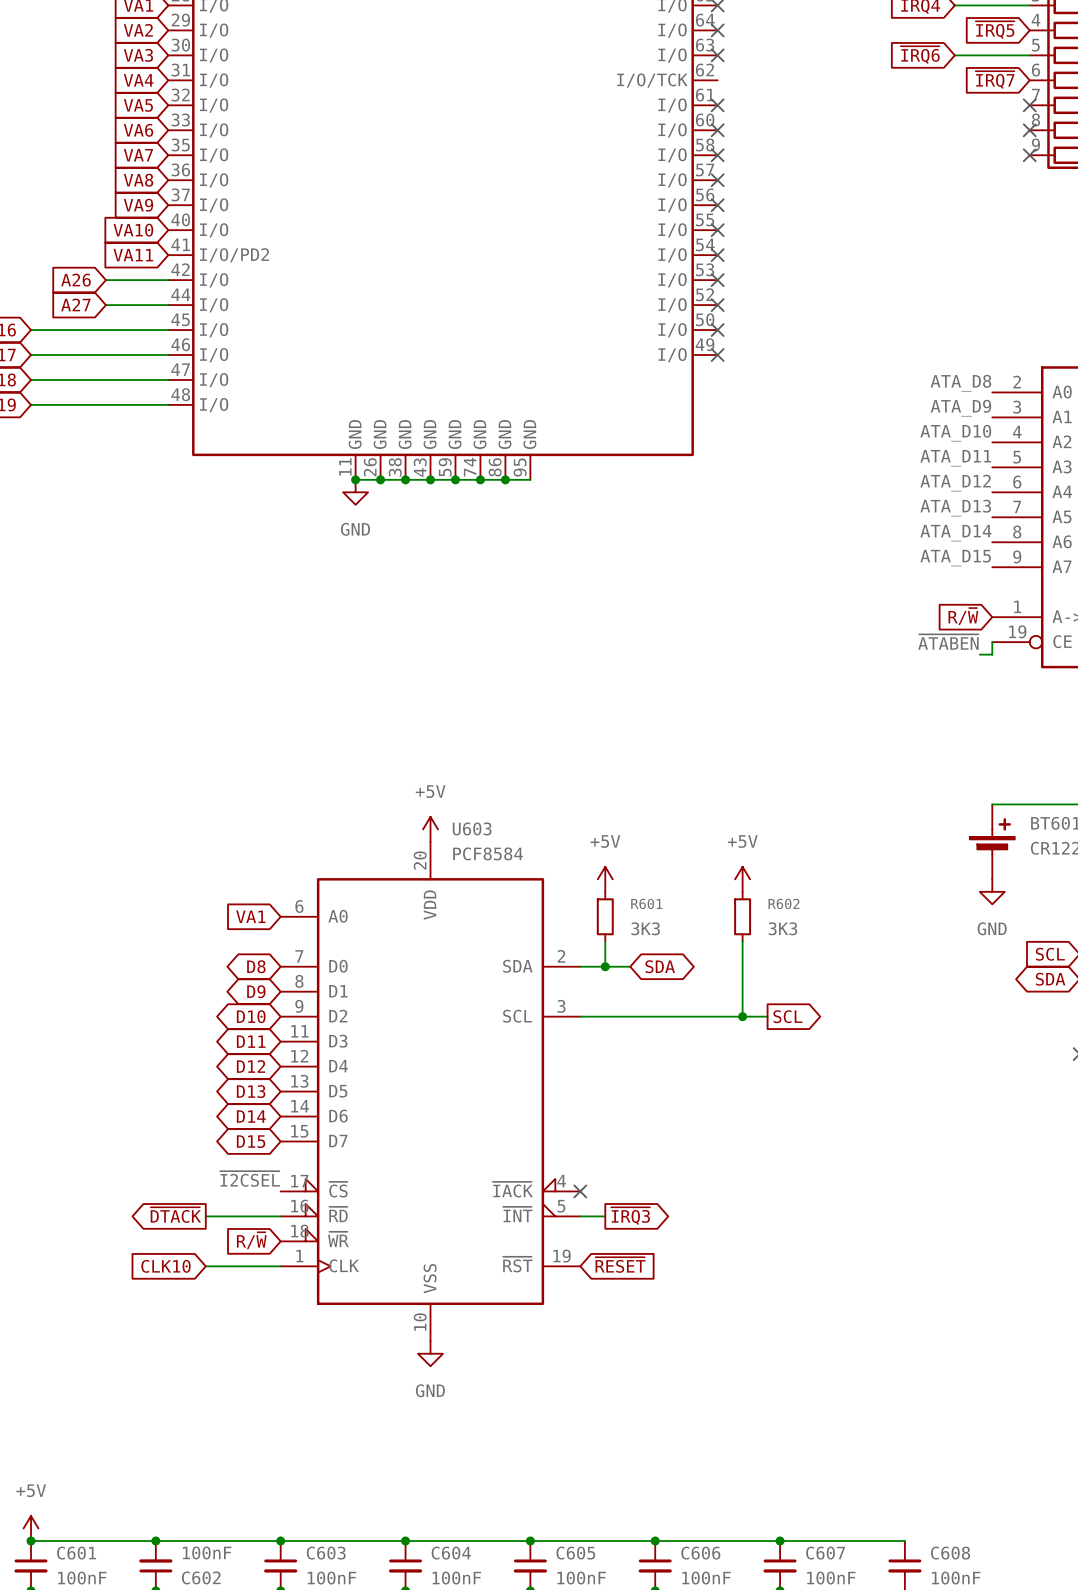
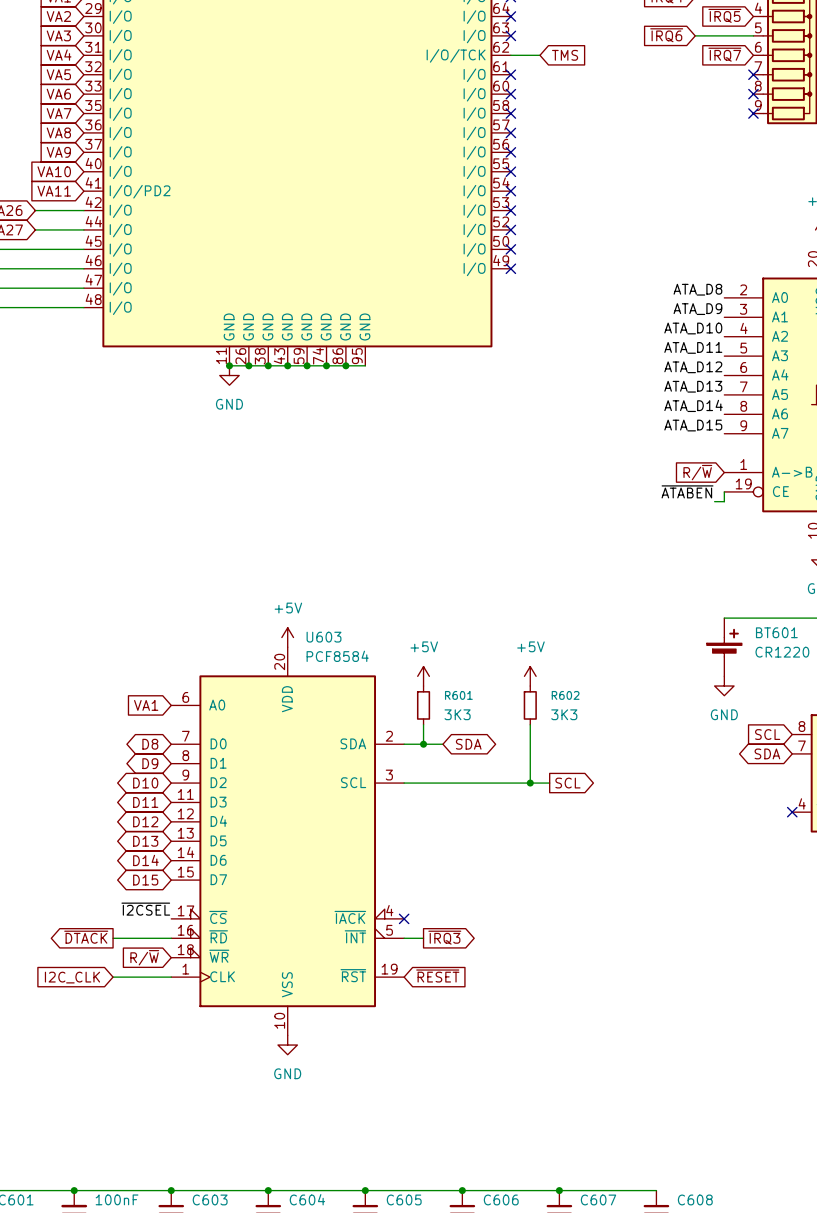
wire: none -> (510, 55) (539, 55)
global label: none -> TMS (565, 55)
global label: CLK10 (166, 1266) -> I2C_CLK (72, 977)

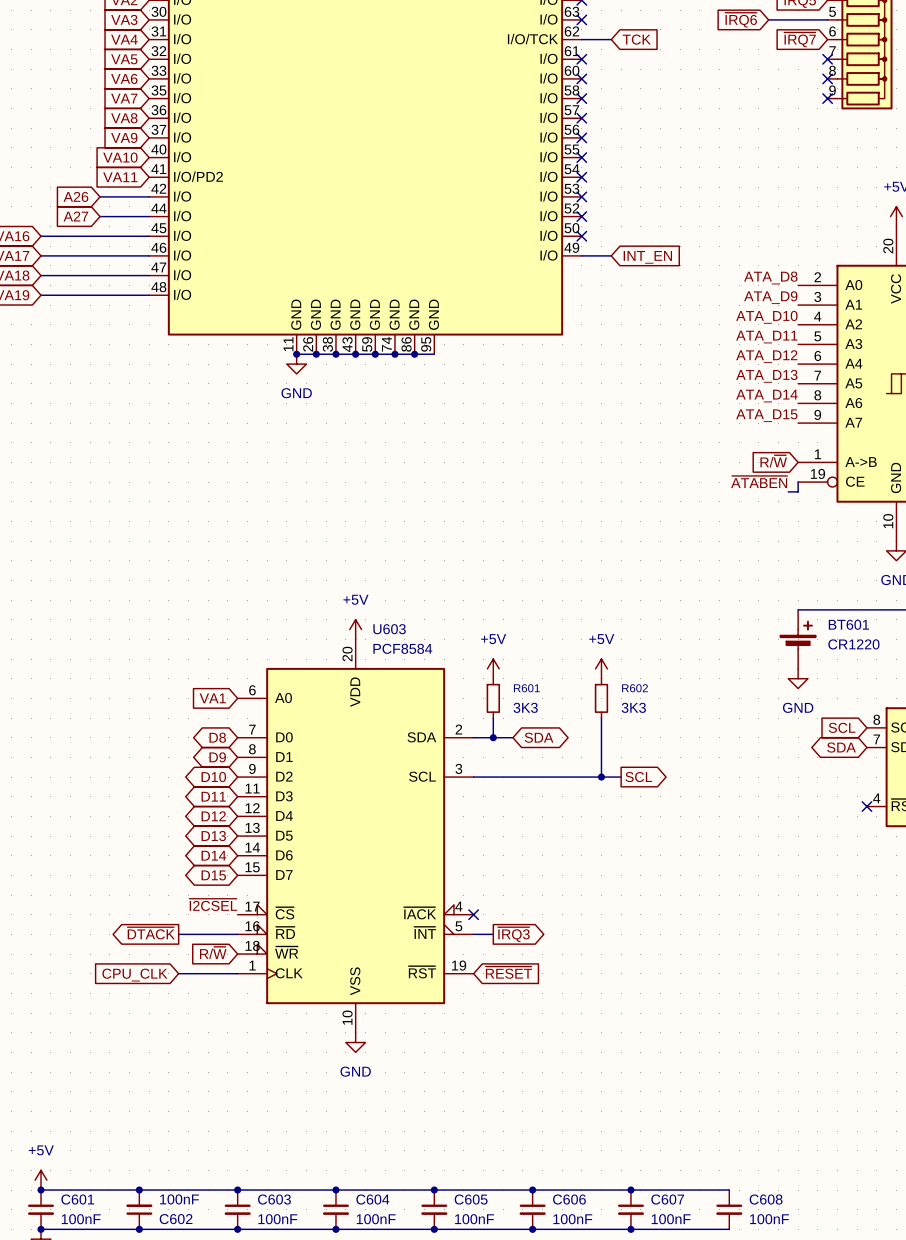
global label: TMS (565, 55) -> TCK (636, 39)
wire: none -> (581, 255) (611, 255)
no-connect mark: (510, 268) -> none
global label: none -> INT_EN (647, 257)
global label: I2C_CLK (72, 977) -> CPU_CLK (134, 975)

